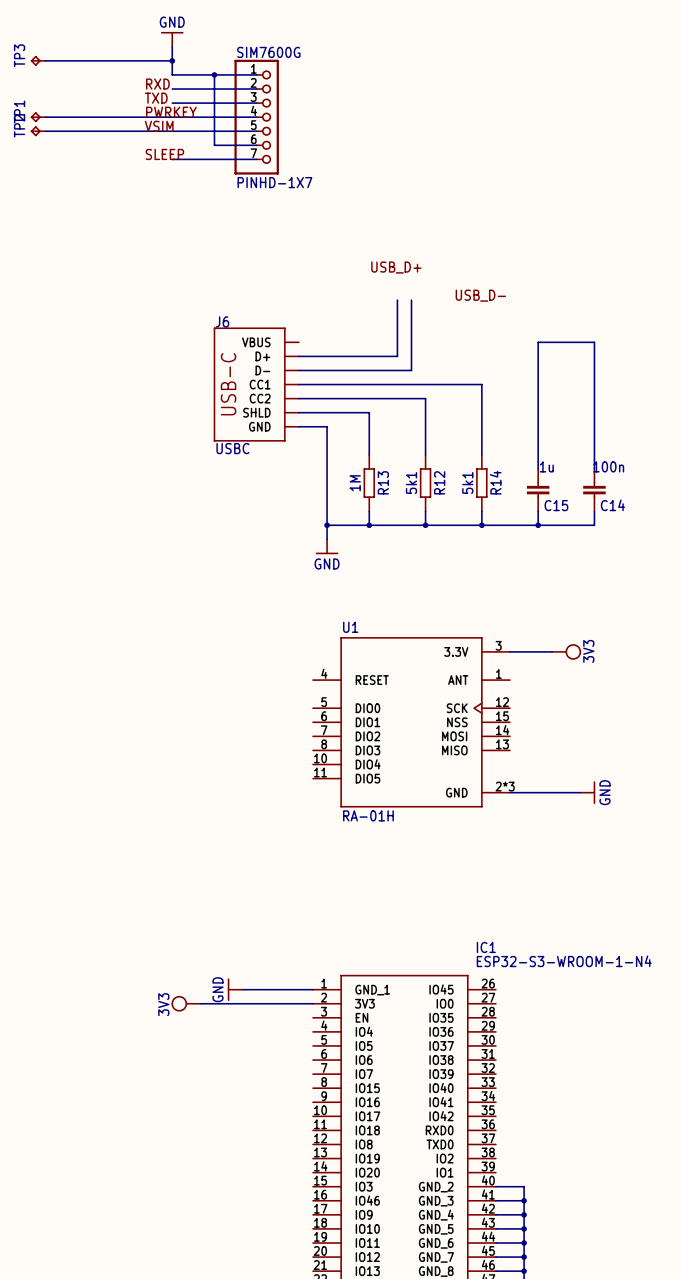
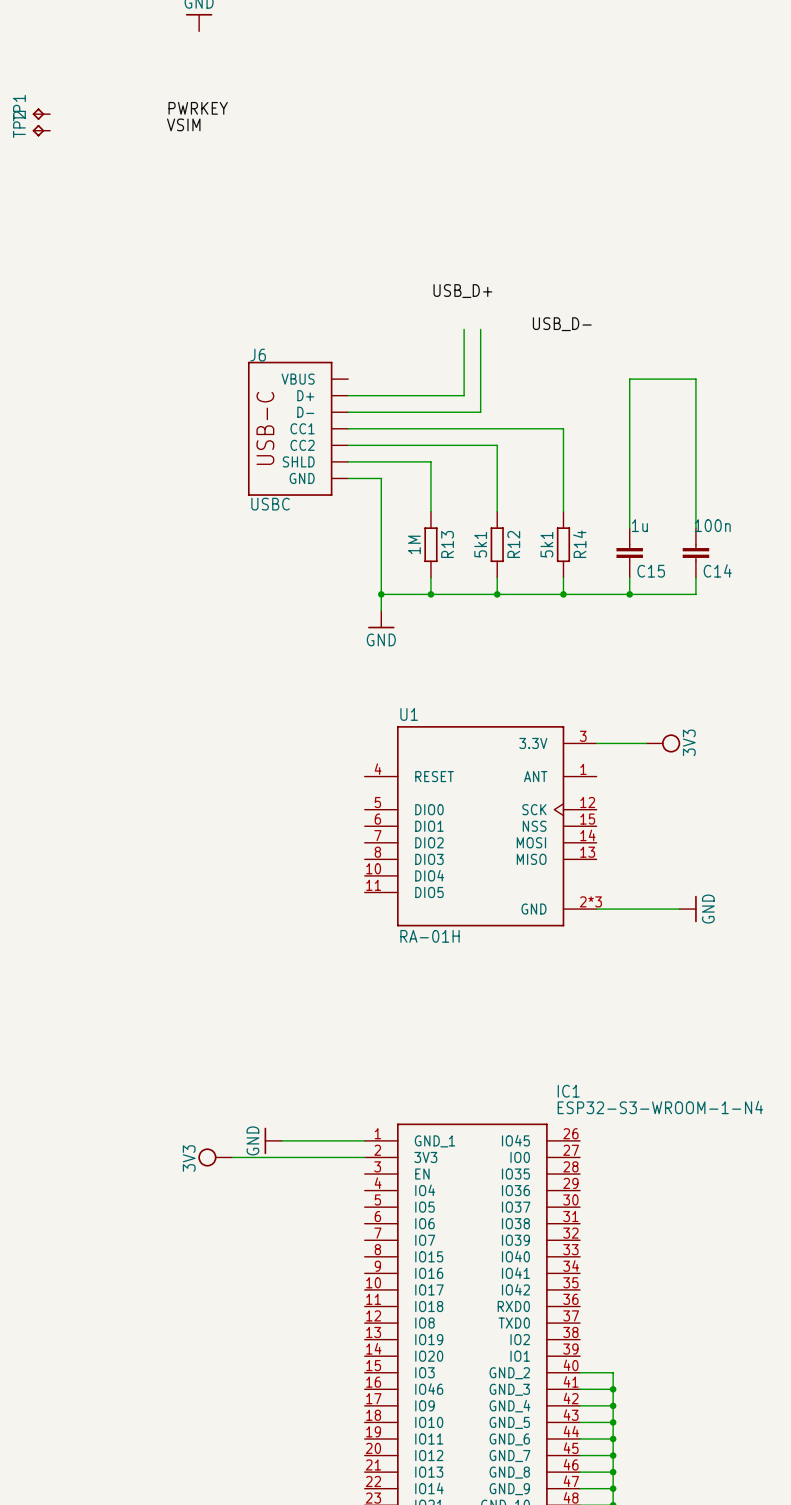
wire: (172, 46) (172, 74) (256, 74) -> none
TP3: (38, 60) -> none
wire: (45, 60) (172, 60) -> none
junction: (172, 60) -> none
wire: (214, 74) (214, 145) (256, 145) -> none
junction: (214, 74) -> none
label: RXD (157, 84) -> none
wire: (172, 89) (256, 89) -> none
label: TXD (156, 98) -> none
wire: (172, 103) (256, 103) -> none
wire: (45, 117) (256, 117) -> none
SIM7600G: PINHD-1X7 (256, 117) -> none
wire: (45, 131) (256, 131) -> none
label: SLEEP (164, 154) -> none
wire: (172, 159) (256, 159) -> none

